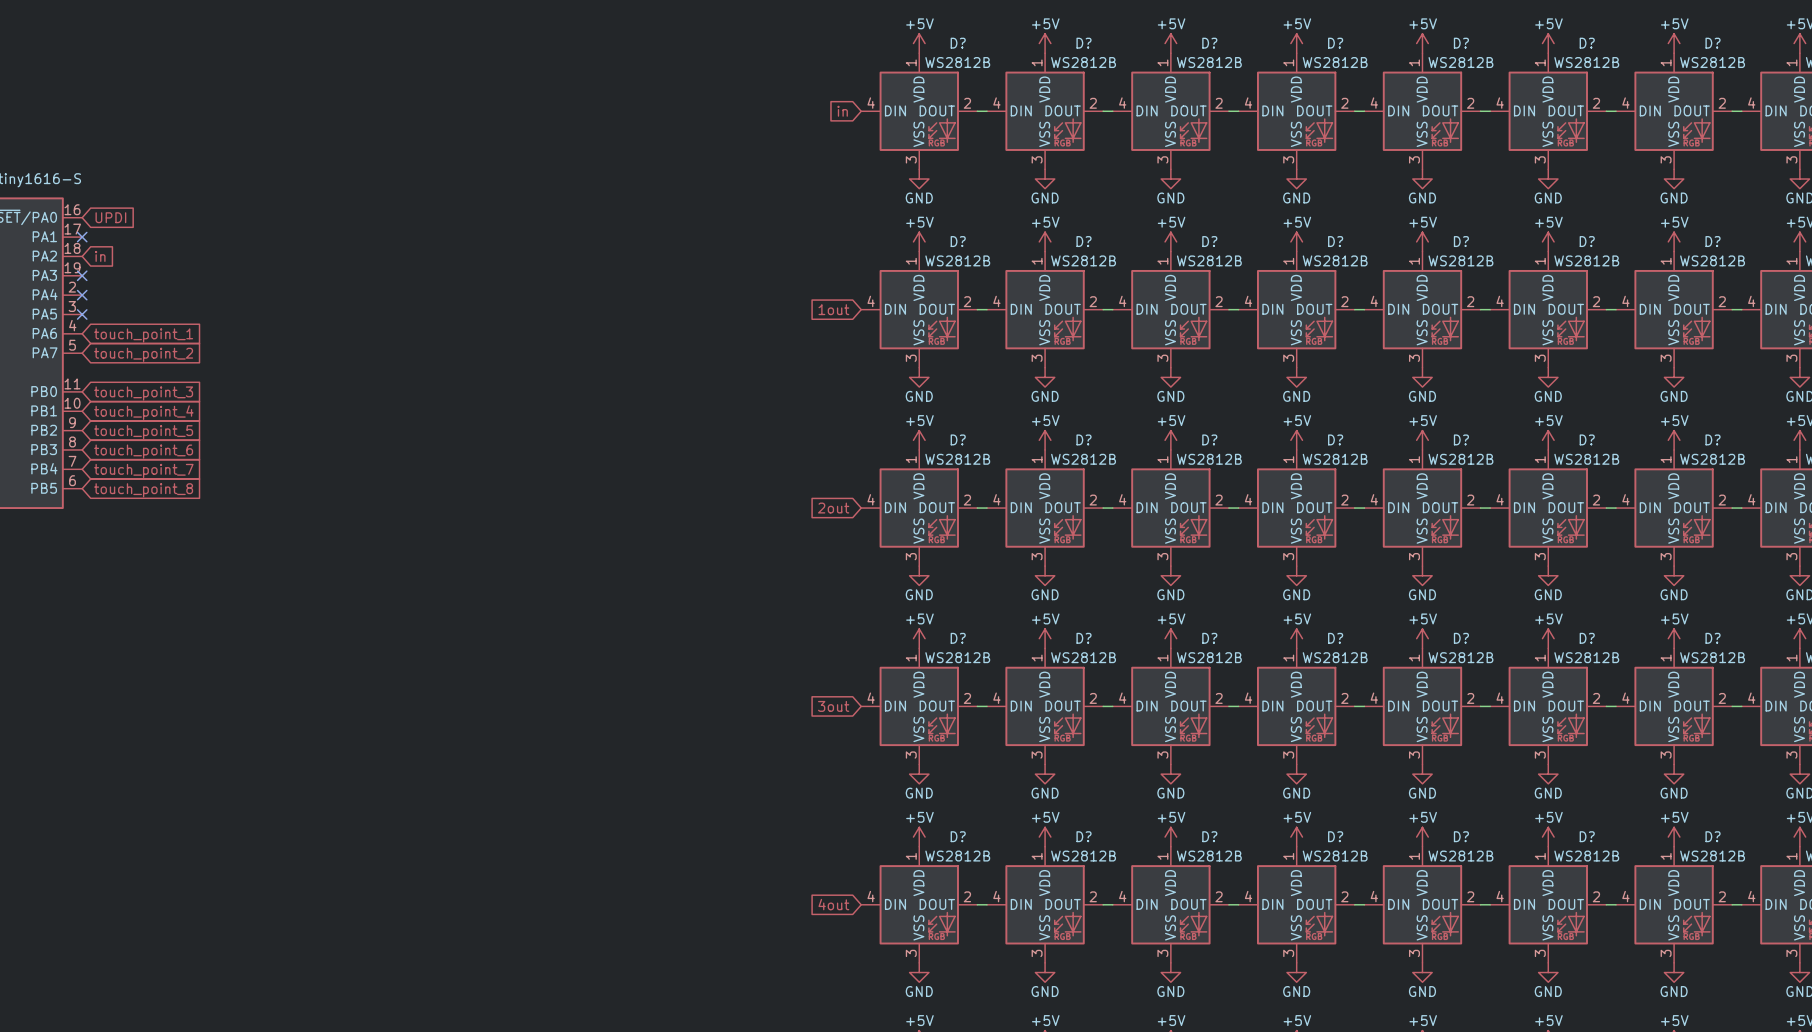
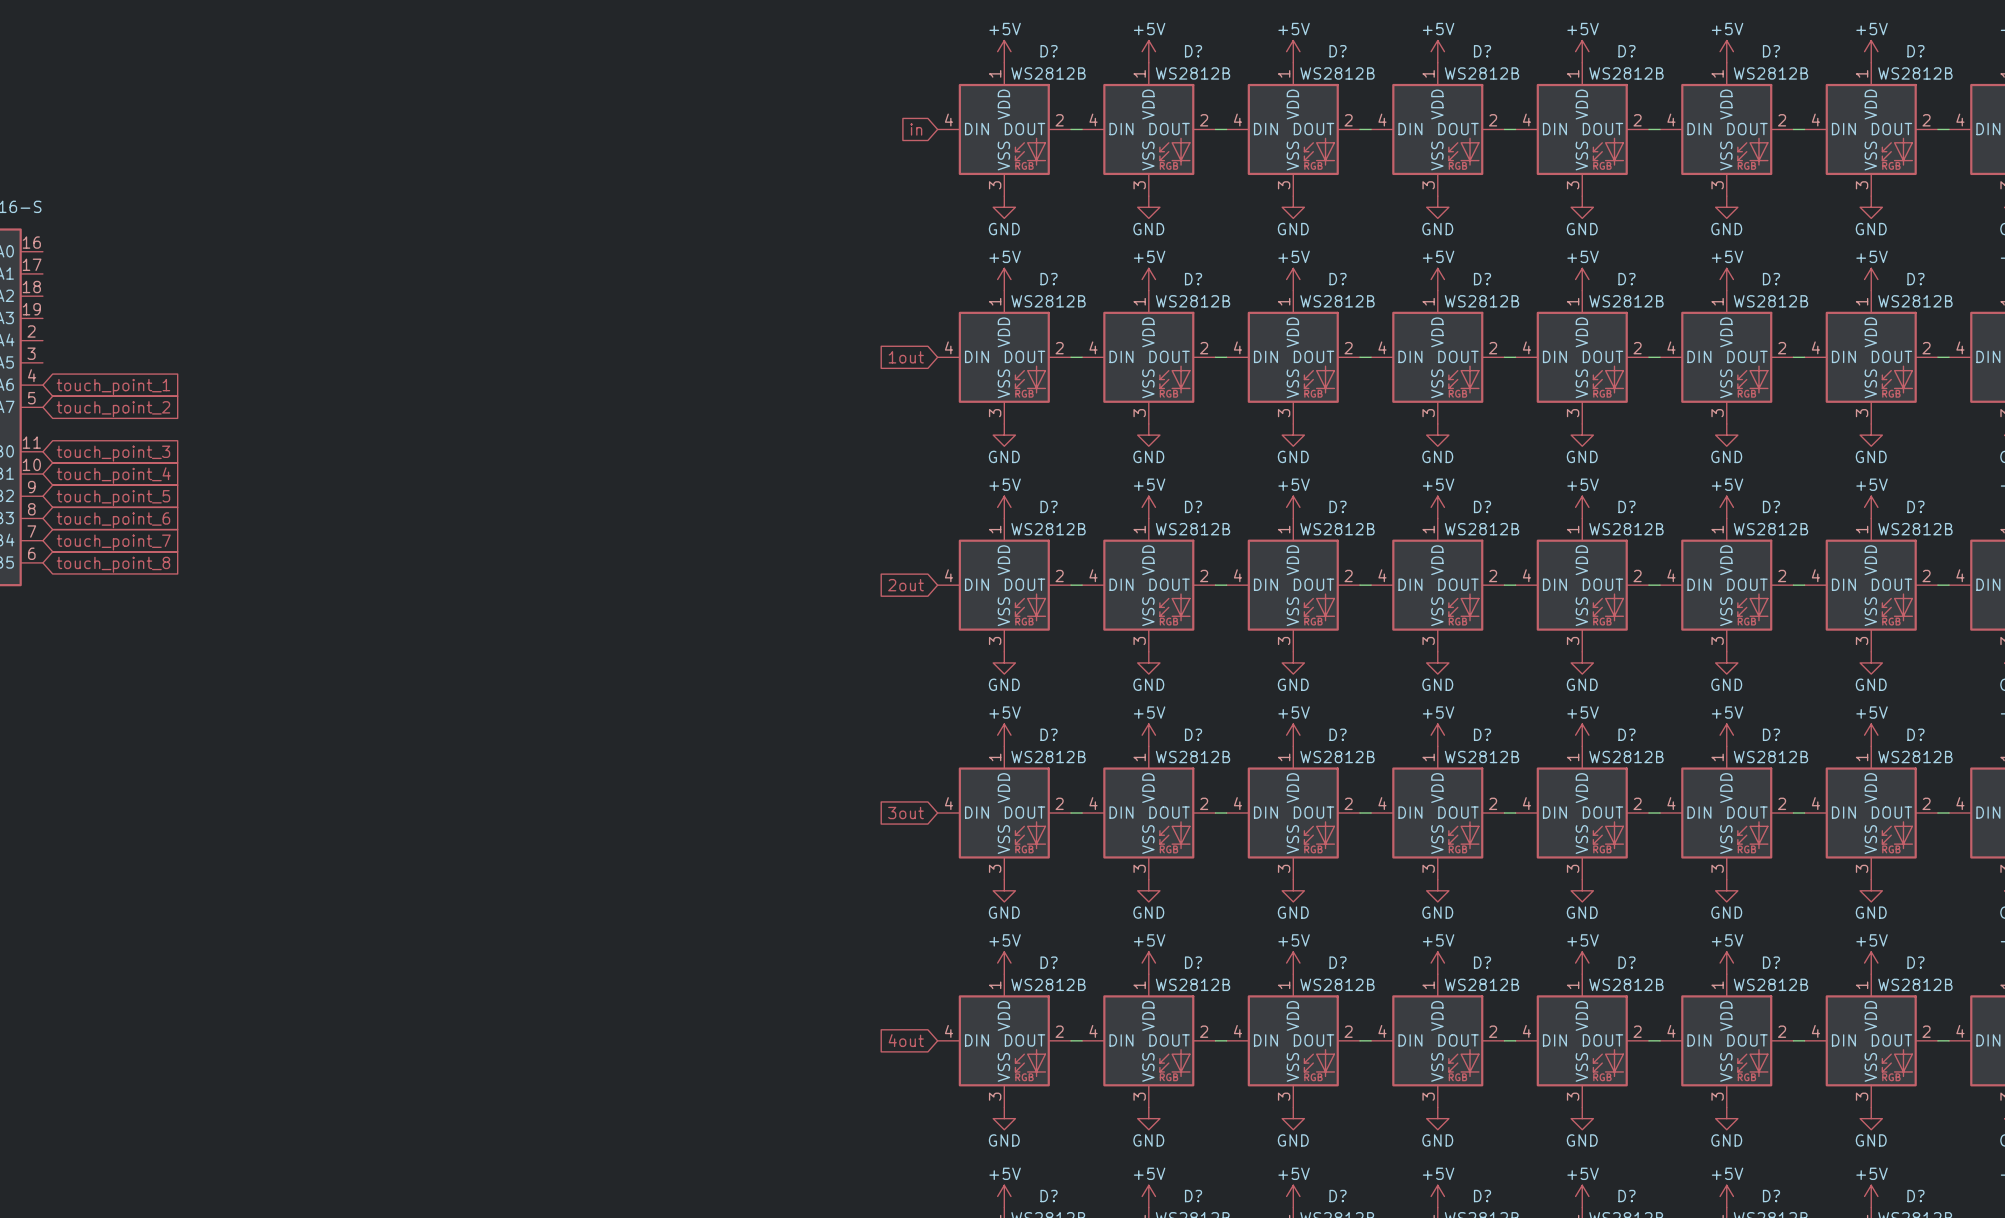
global label: UPDI (110, 217) -> none
no-connect mark: (82, 237) -> none
global label: in (100, 256) -> none
no-connect mark: (82, 275) -> none
no-connect mark: (82, 295) -> none
no-connect mark: (82, 314) -> none

